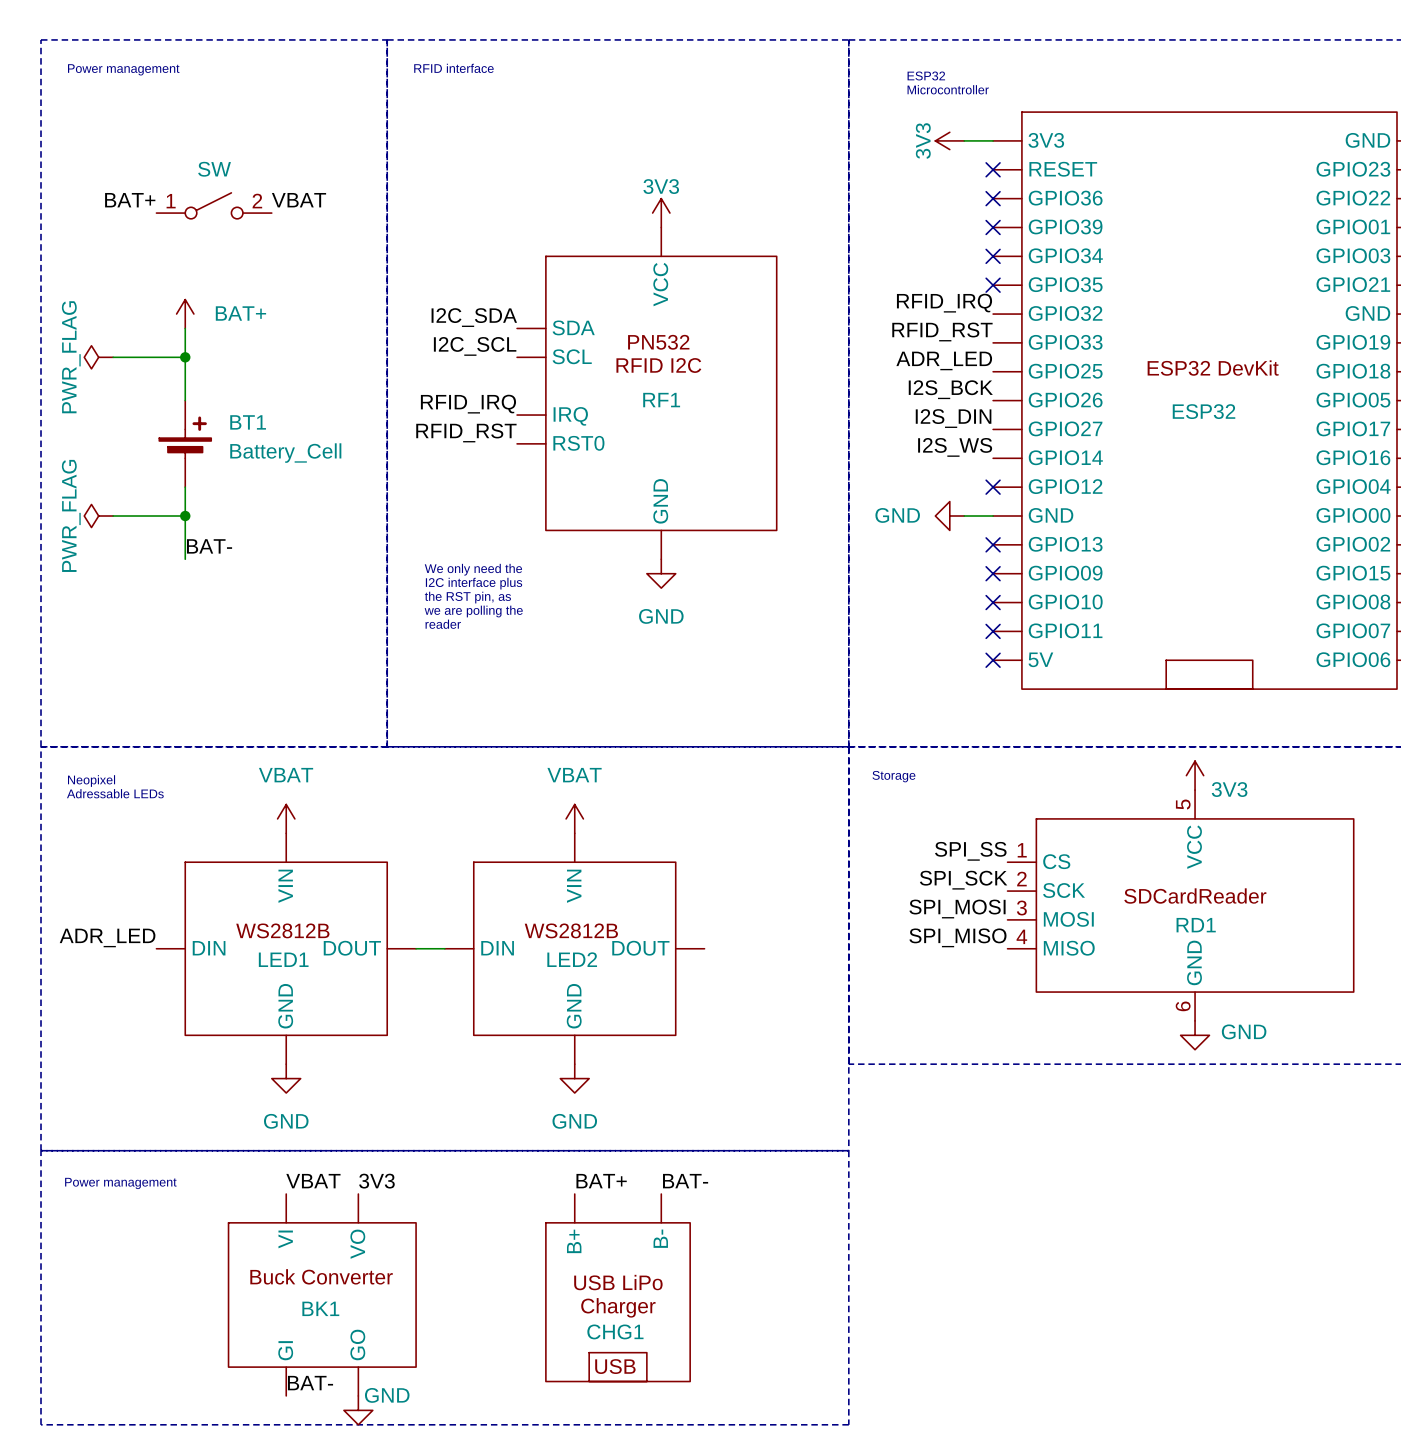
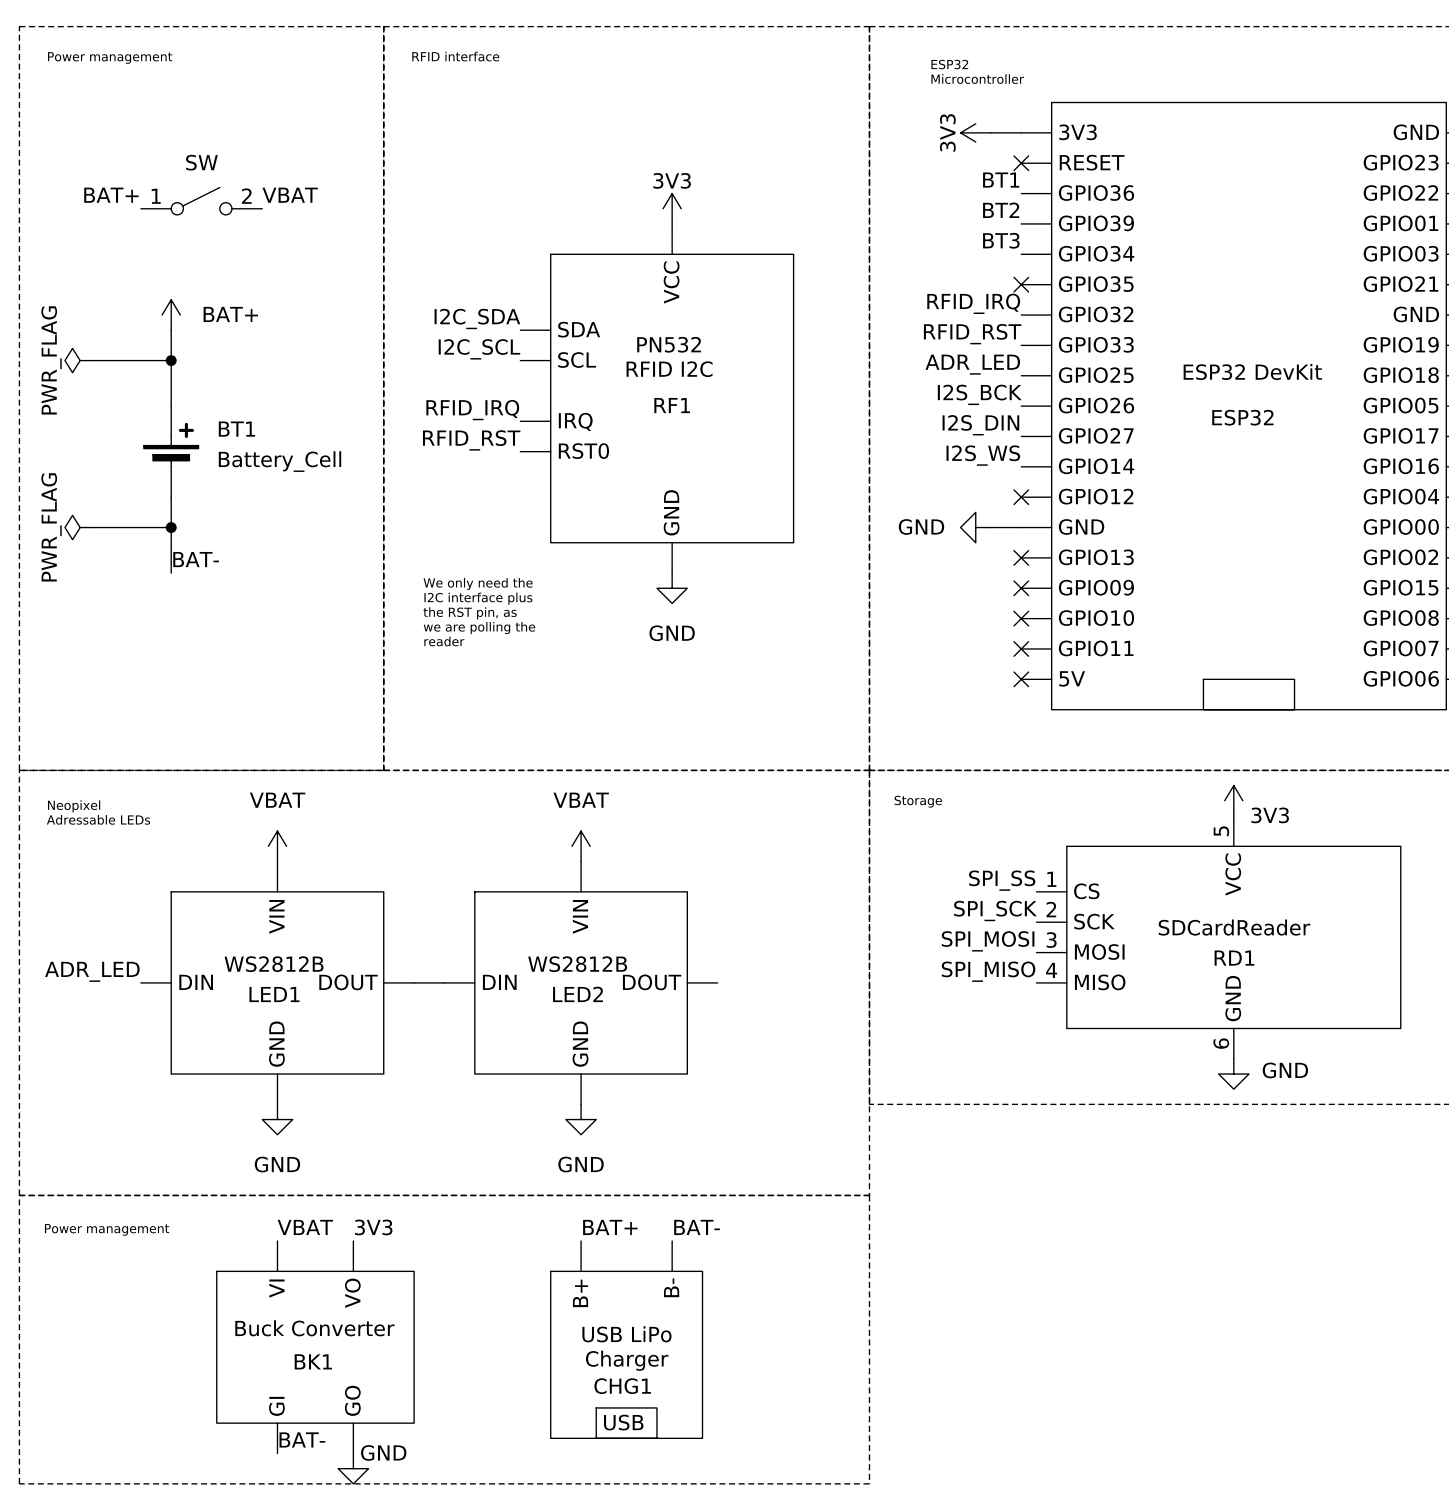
label: none -> BT1 (1001, 180)
no-connect mark: (993, 198) -> none
label: none -> BT2 (1001, 210)
no-connect mark: (993, 227) -> none
label: none -> BT3 (1001, 240)
no-connect mark: (993, 256) -> none

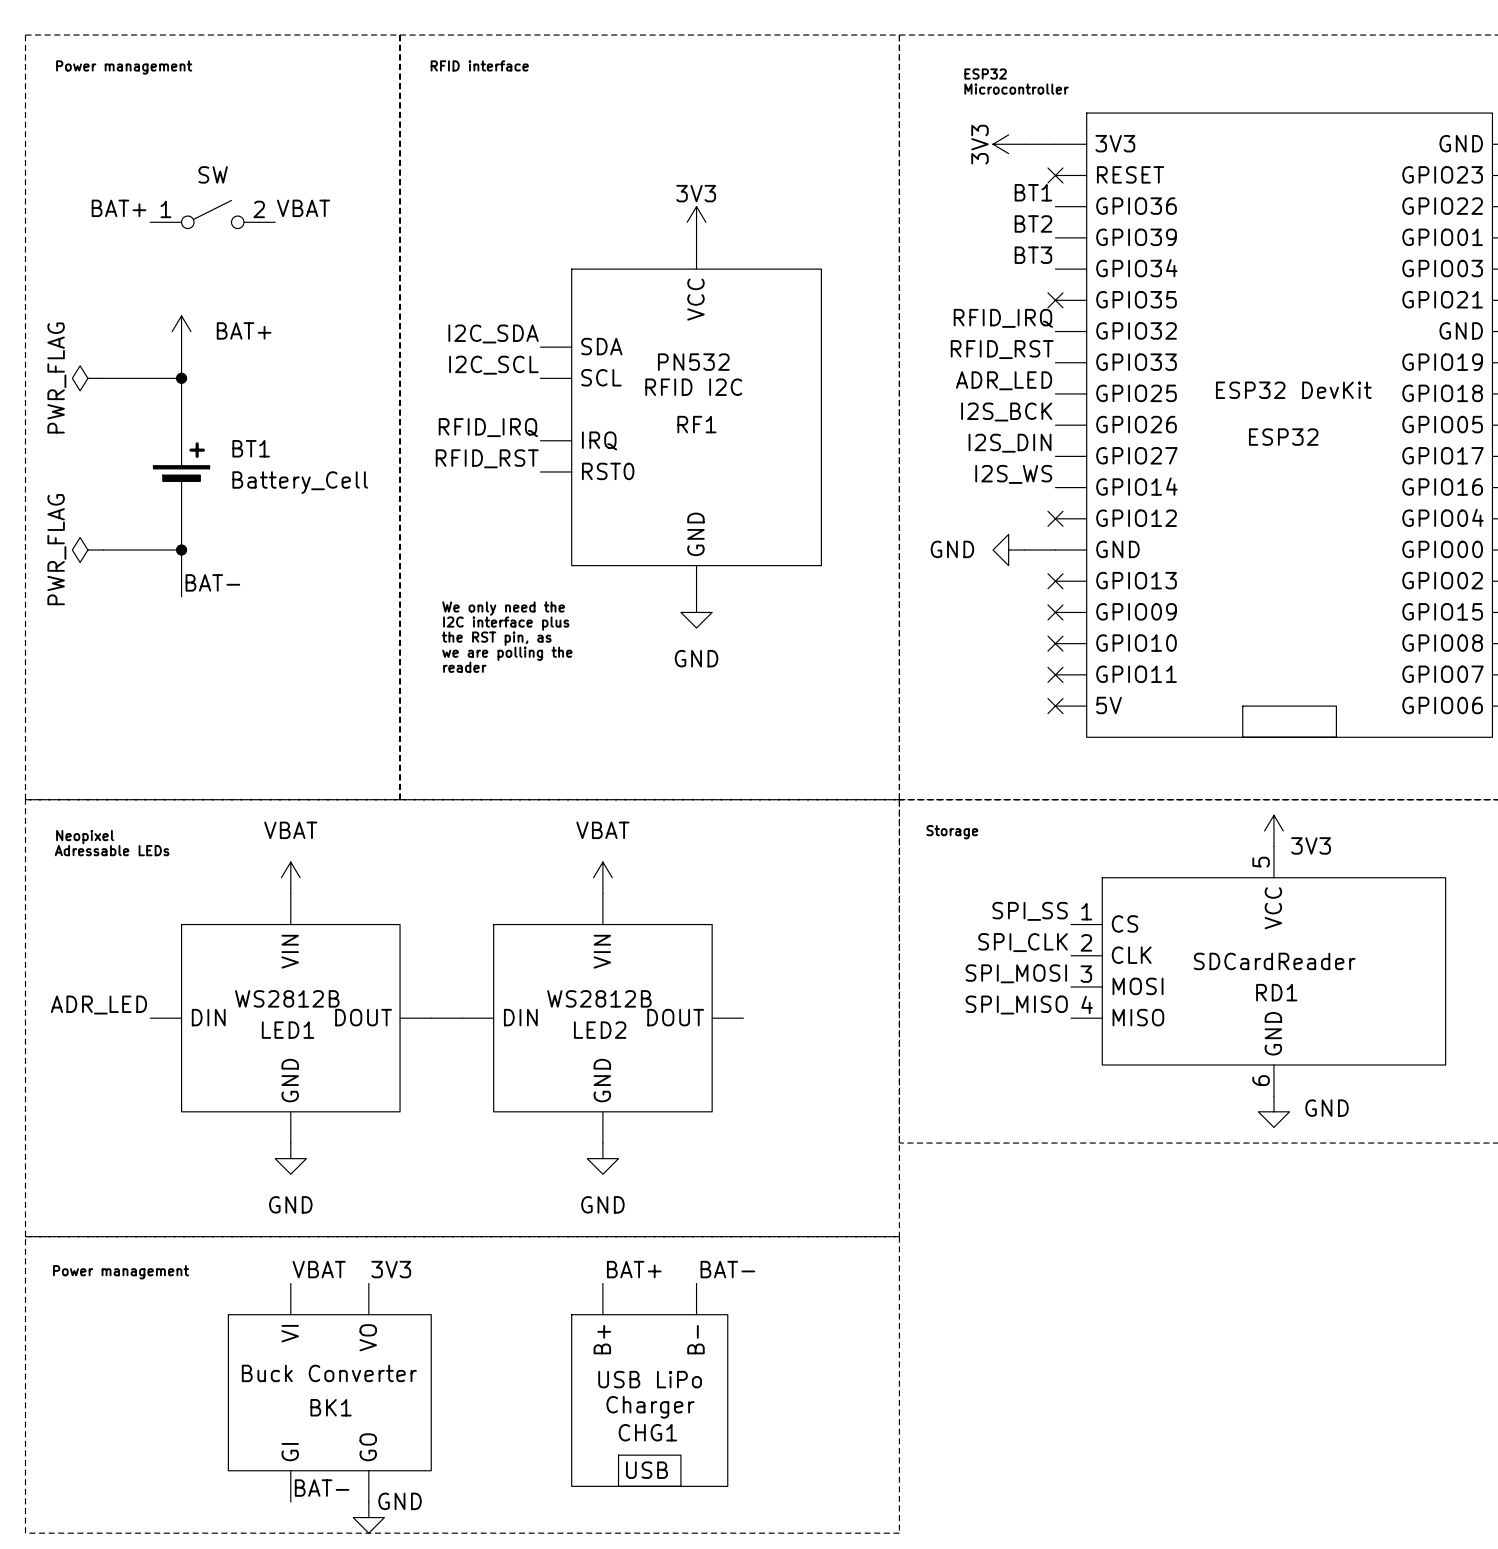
label: SPI_SCK (995, 910) -> SPI_CLK (1023, 942)
RD1 pin name: SCK (1094, 921) -> CLK (1131, 955)

